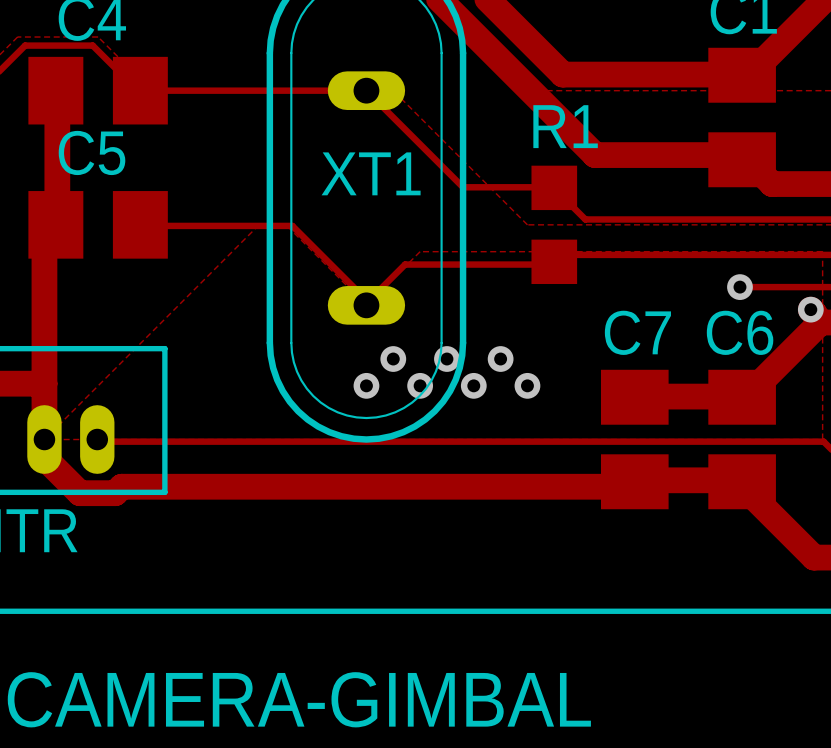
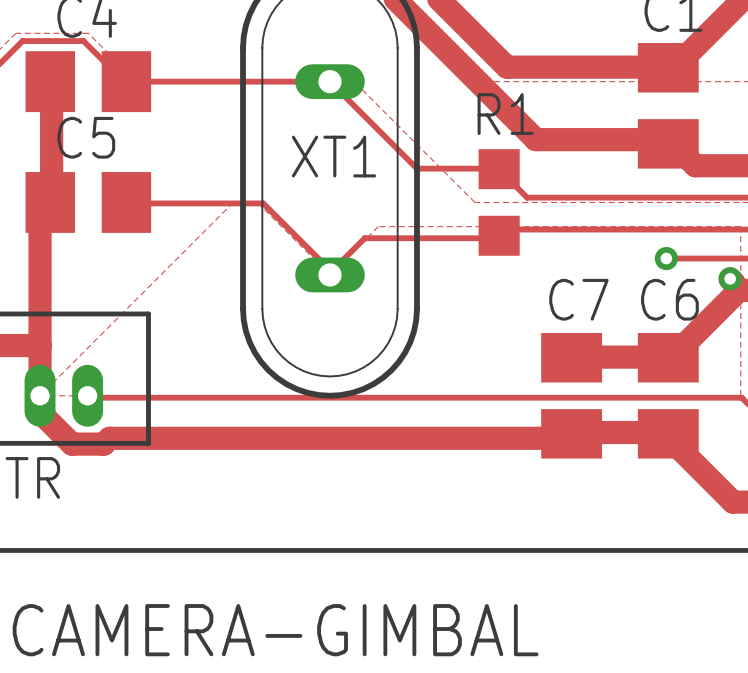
via: (393, 359) -> none
via: (446, 359) -> none
via: (500, 359) -> none
via: (366, 385) -> none
via: (420, 385) -> none
via: (473, 385) -> none
via: (527, 385) -> none

